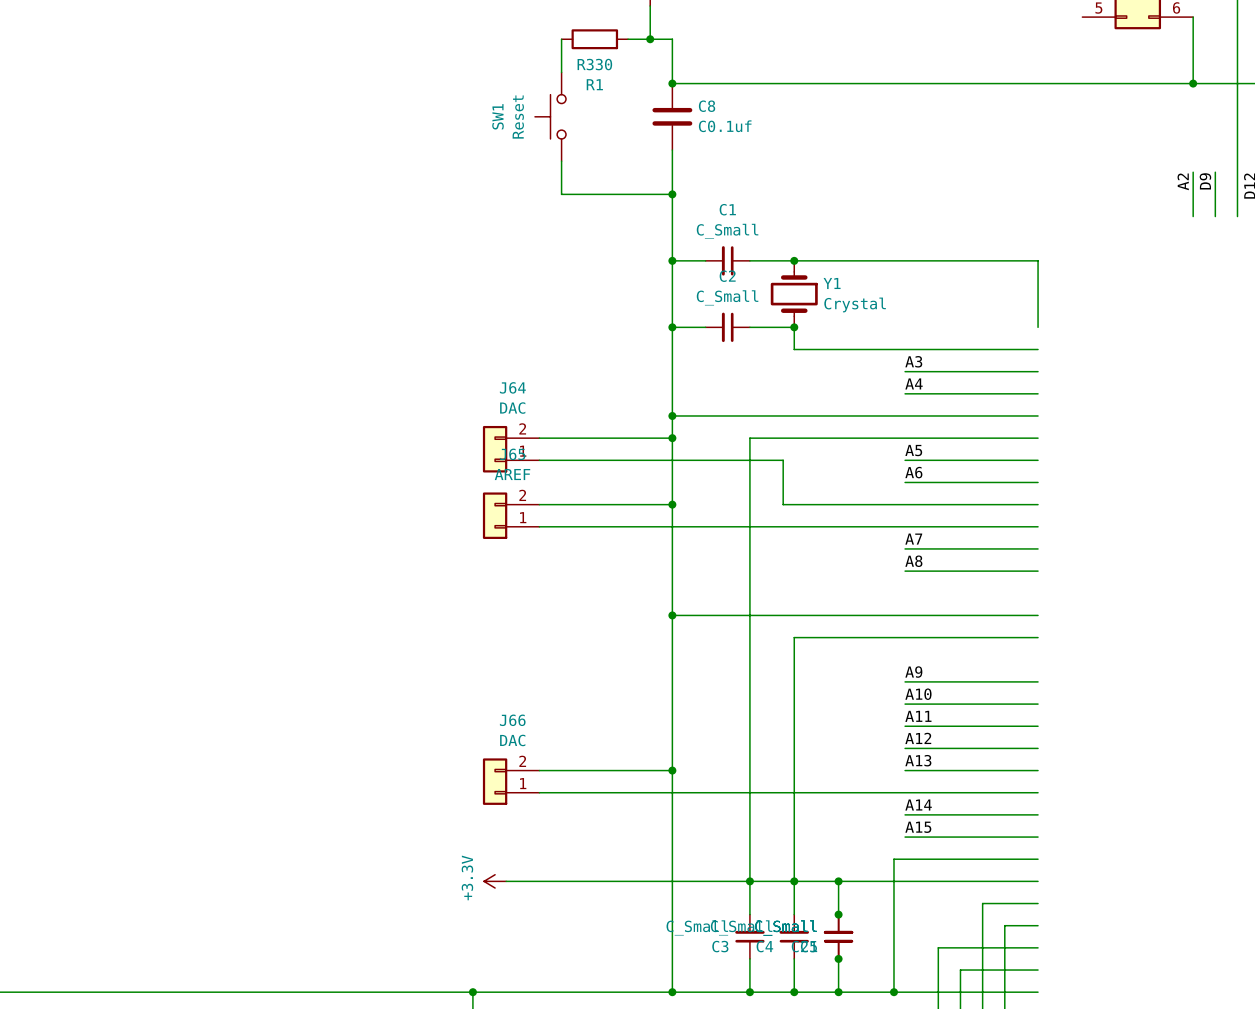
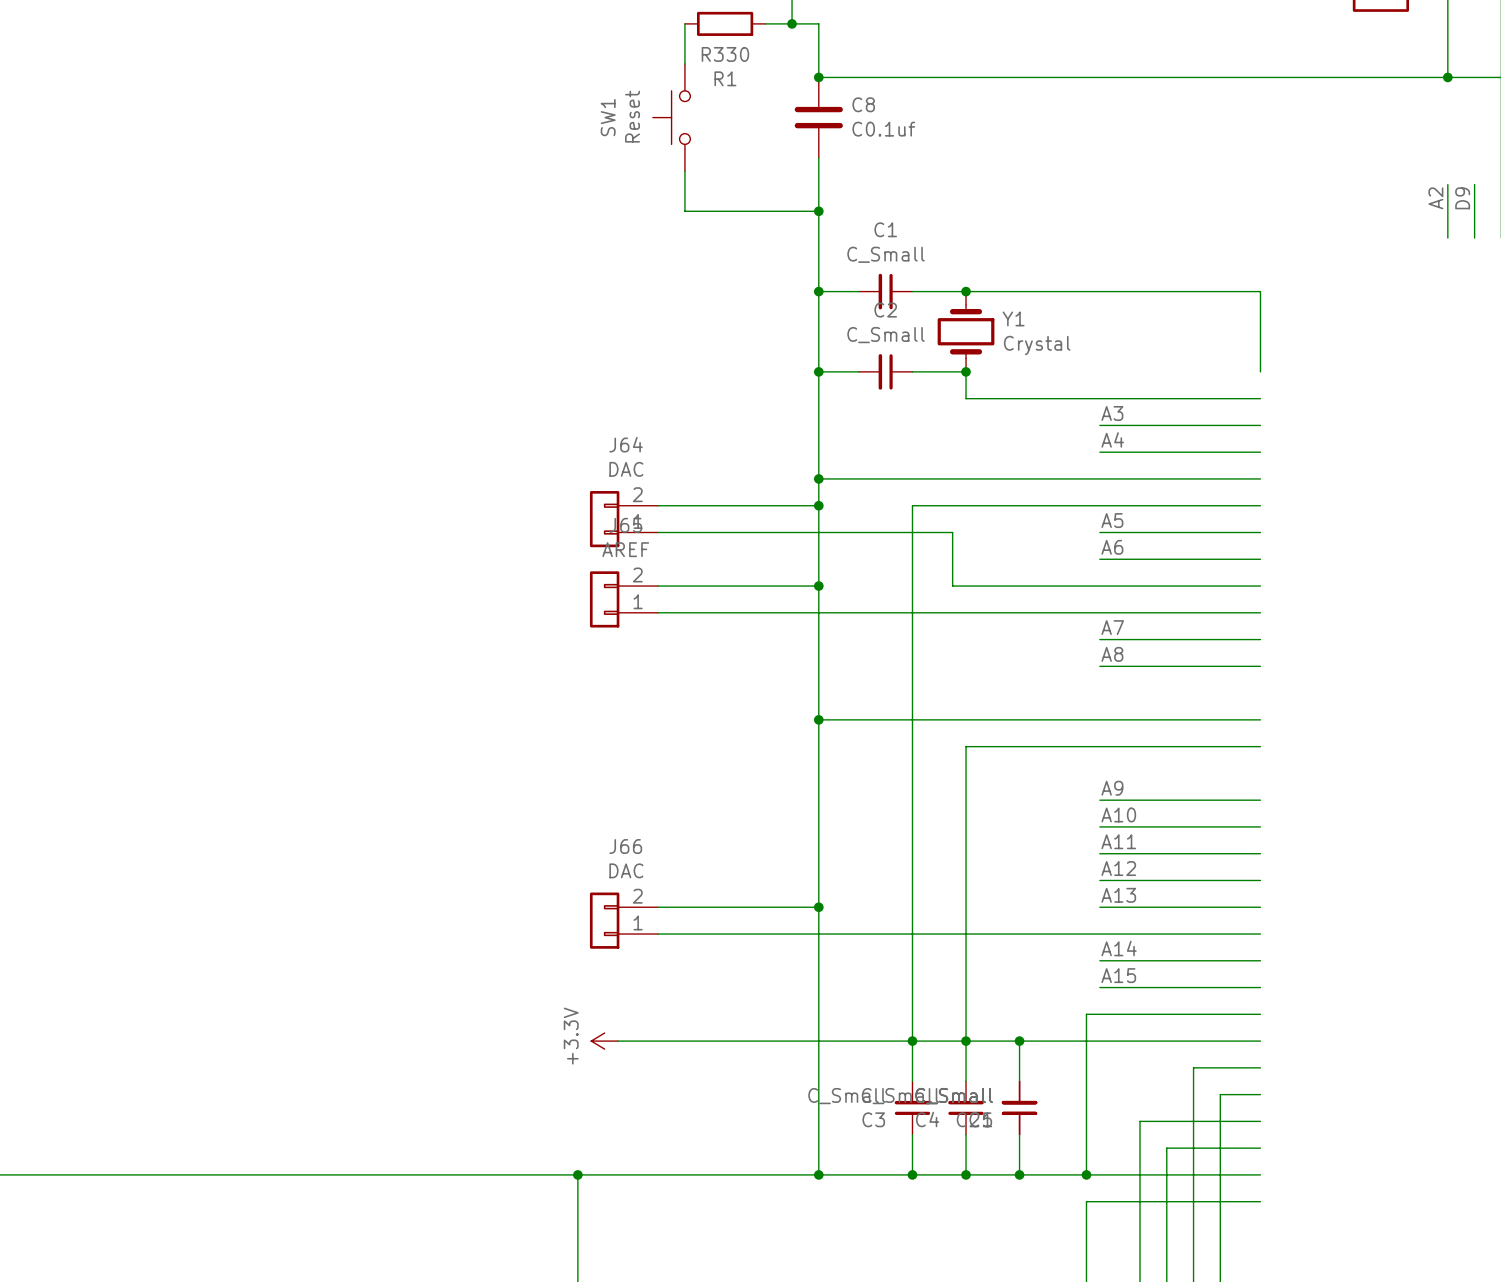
junction: (838, 914) -> none
junction: (838, 958) -> none

